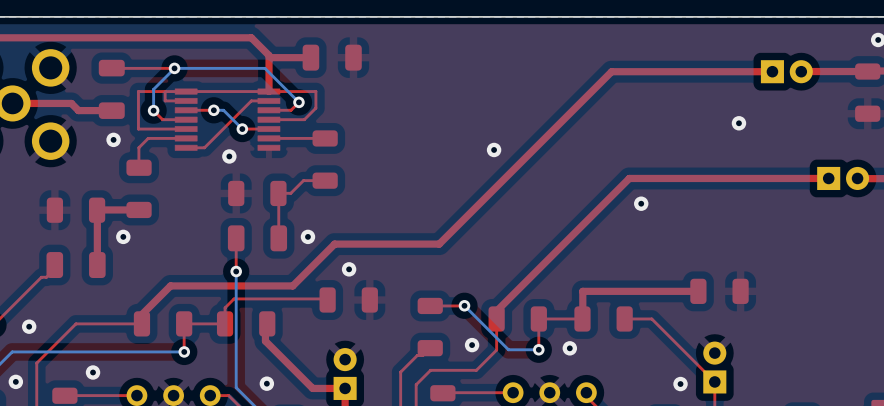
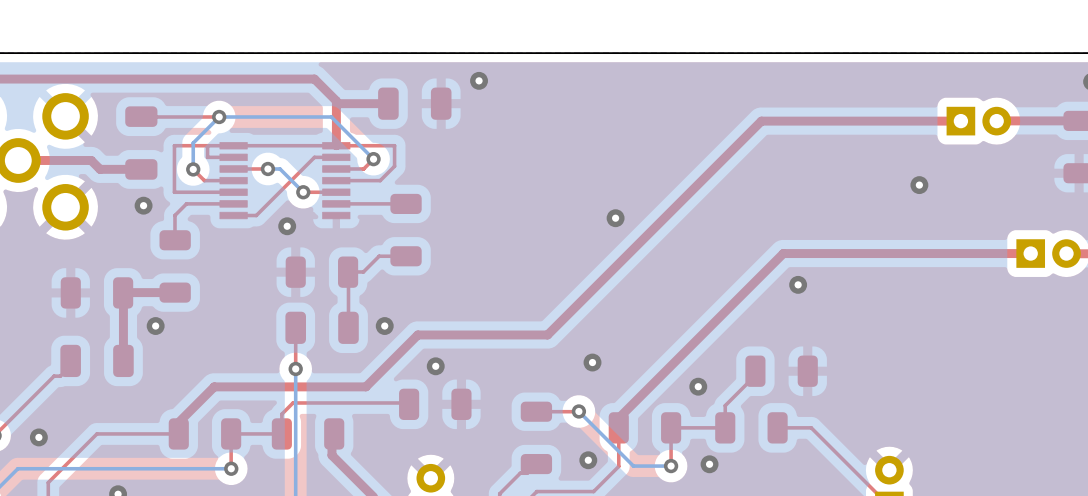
via: none -> (479, 80)
via: none -> (592, 362)
via: none -> (698, 386)
top track: (698, 291) (582, 291) (582, 318) -> (755, 375) (725, 405) (725, 427)
part position: (719, 291) -> (781, 371)

